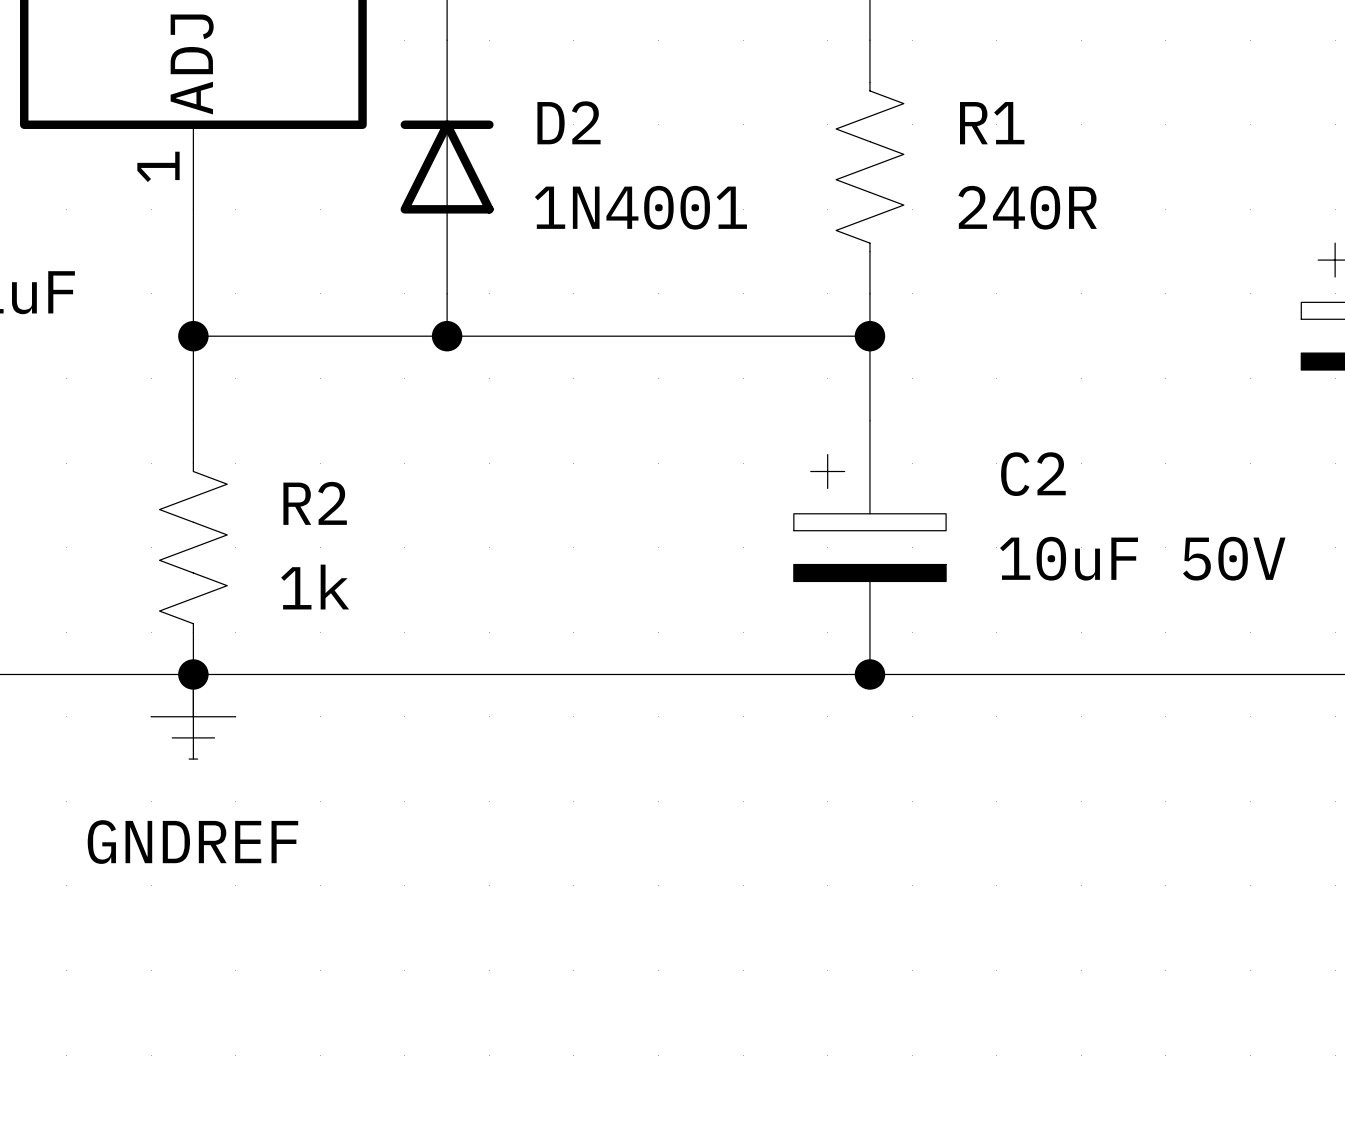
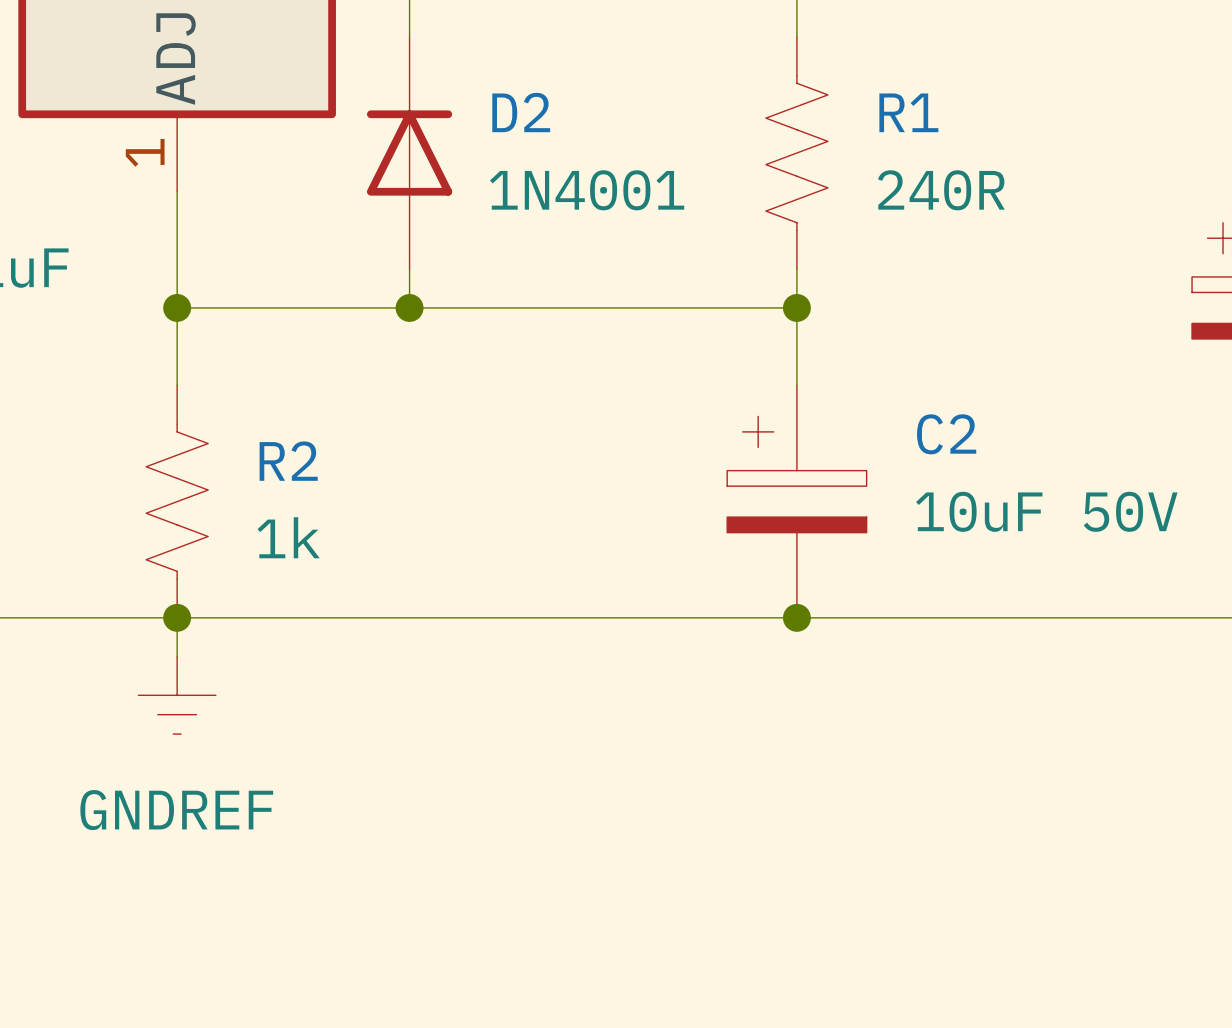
power symbol position: GNDREF (193, 716) -> GNDREF (177, 695)

